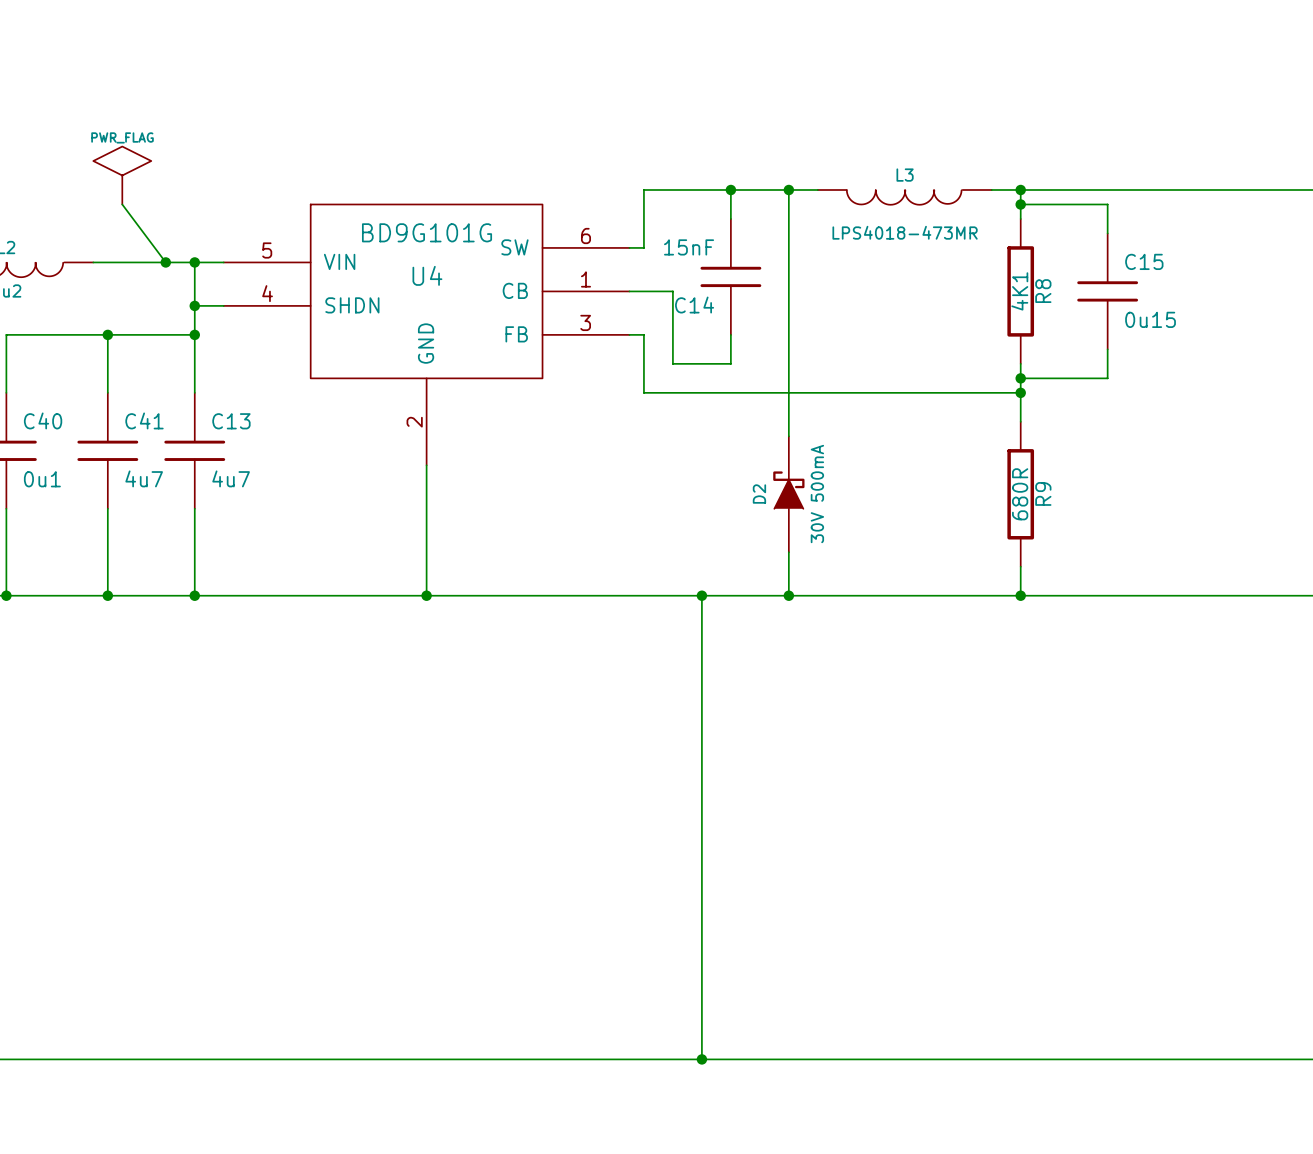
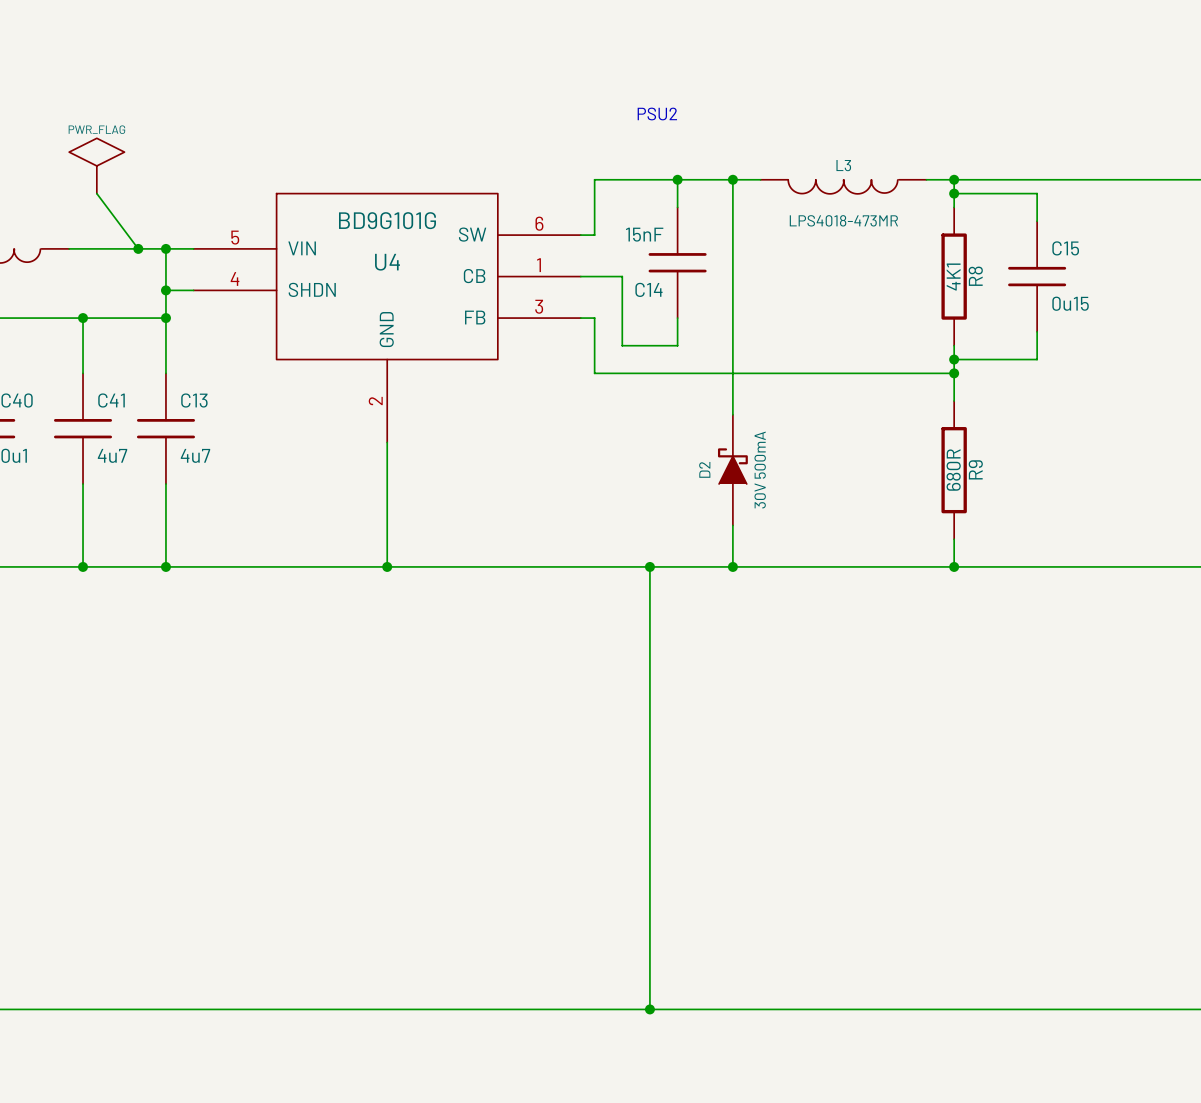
text: none -> PSU2 (657, 114)

